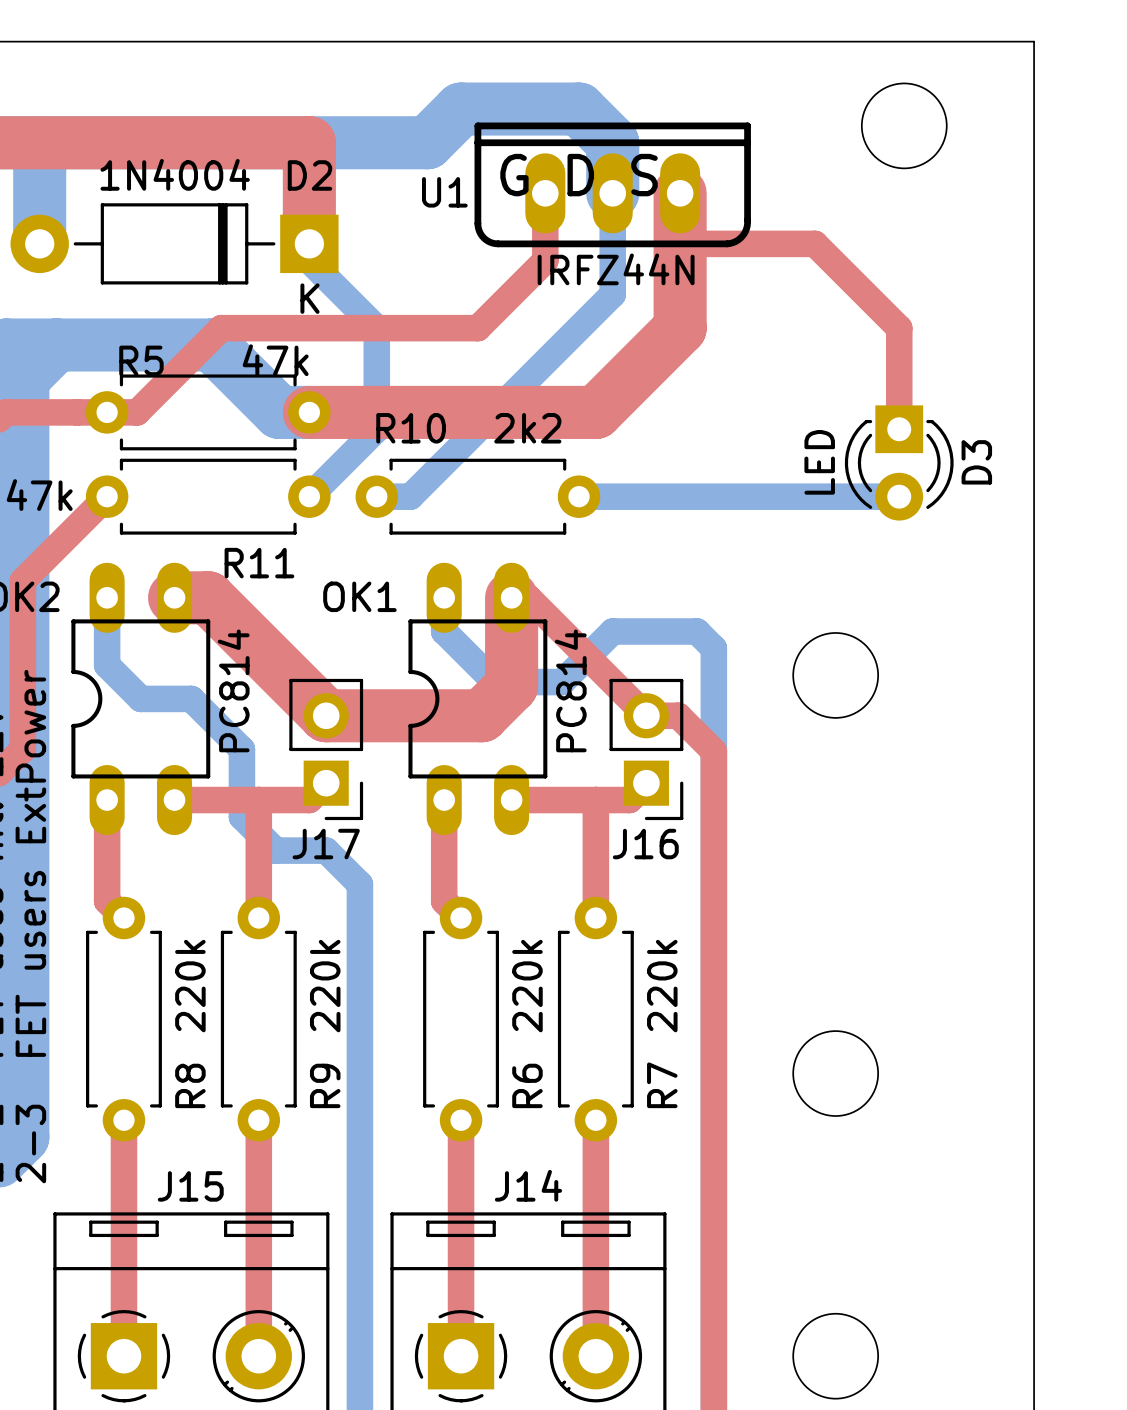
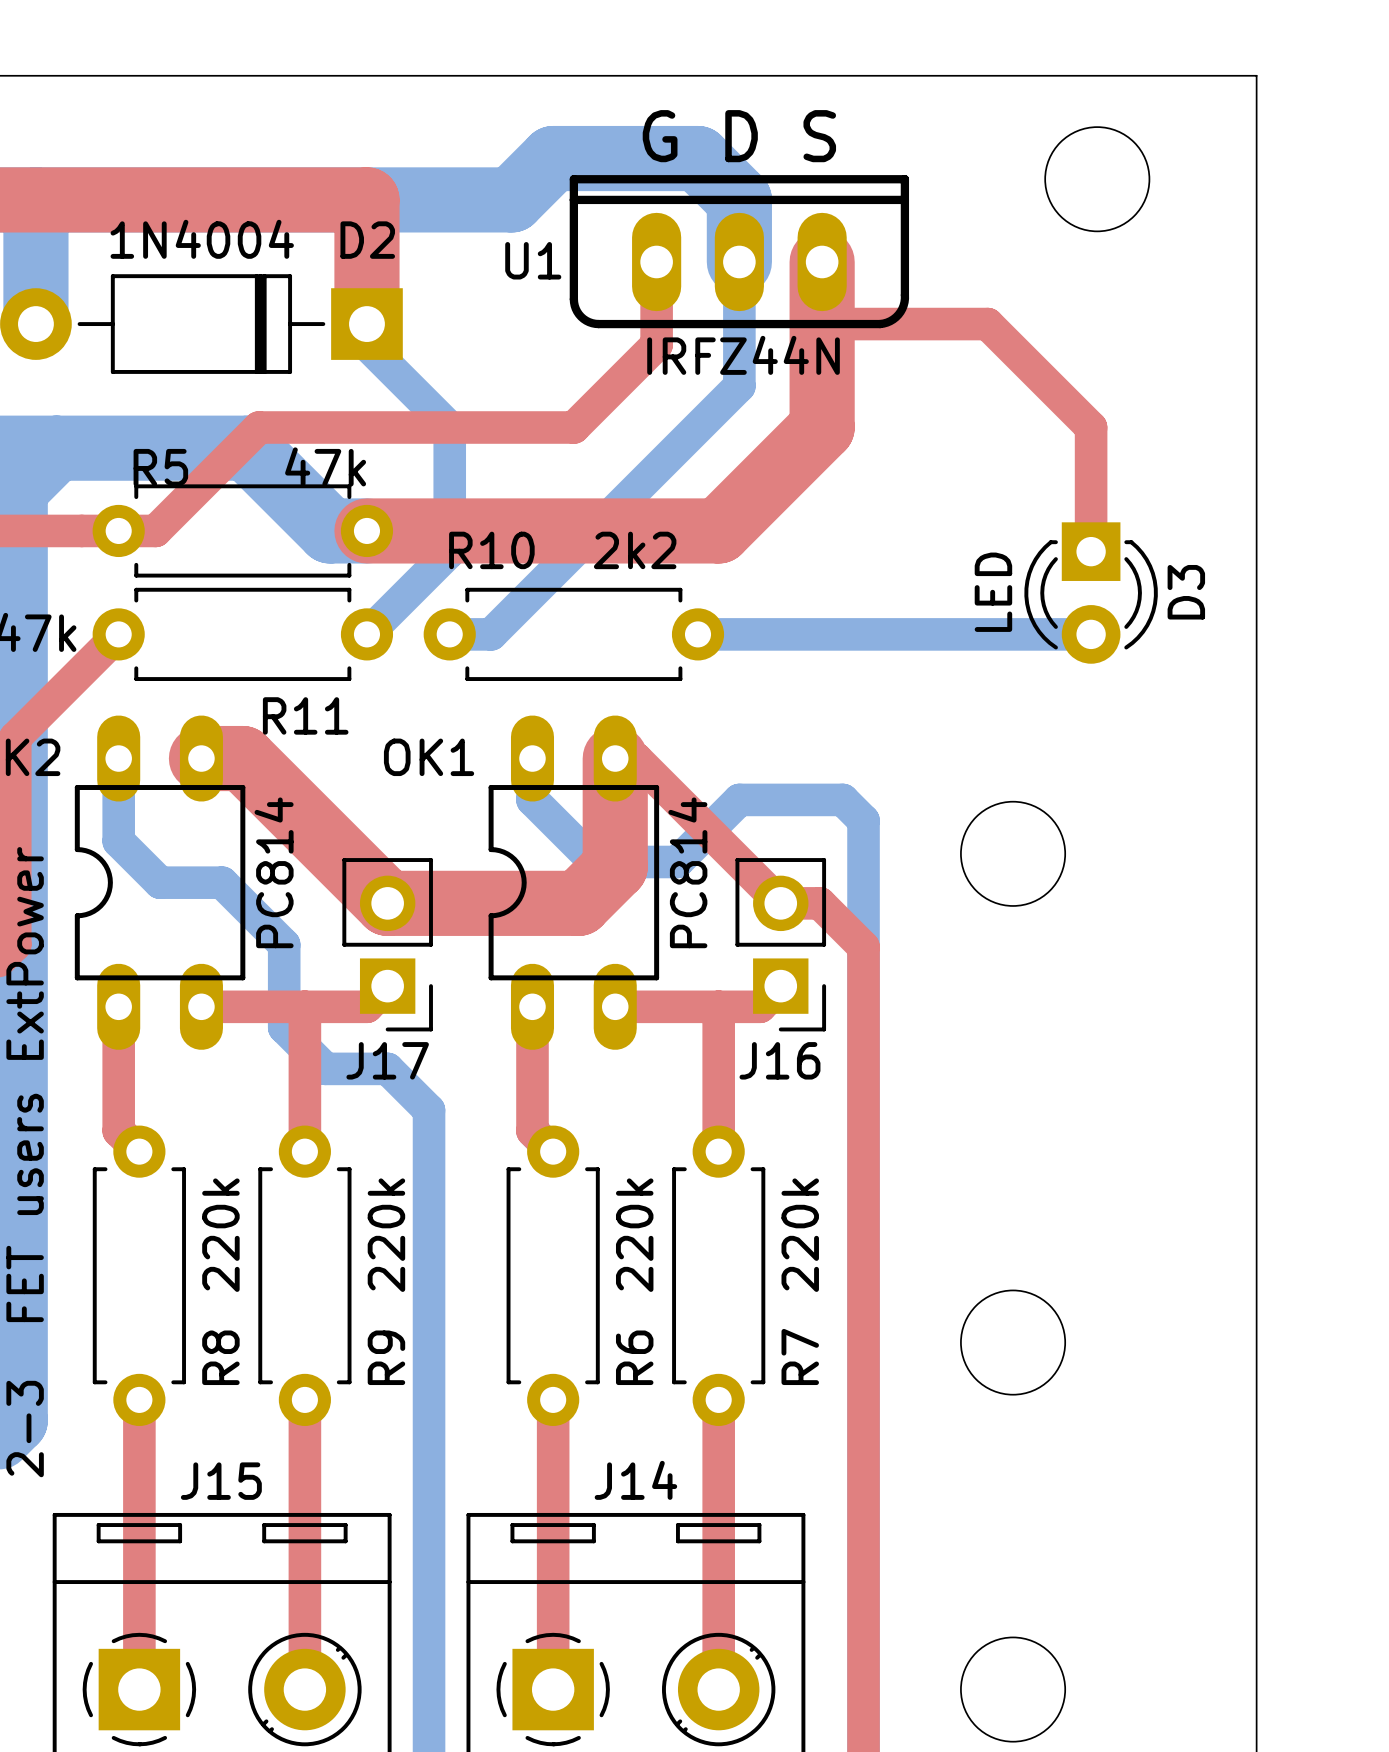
text position: G D S (579, 175) -> G D S (739, 136)
D2 text: K (309, 298) -> none

